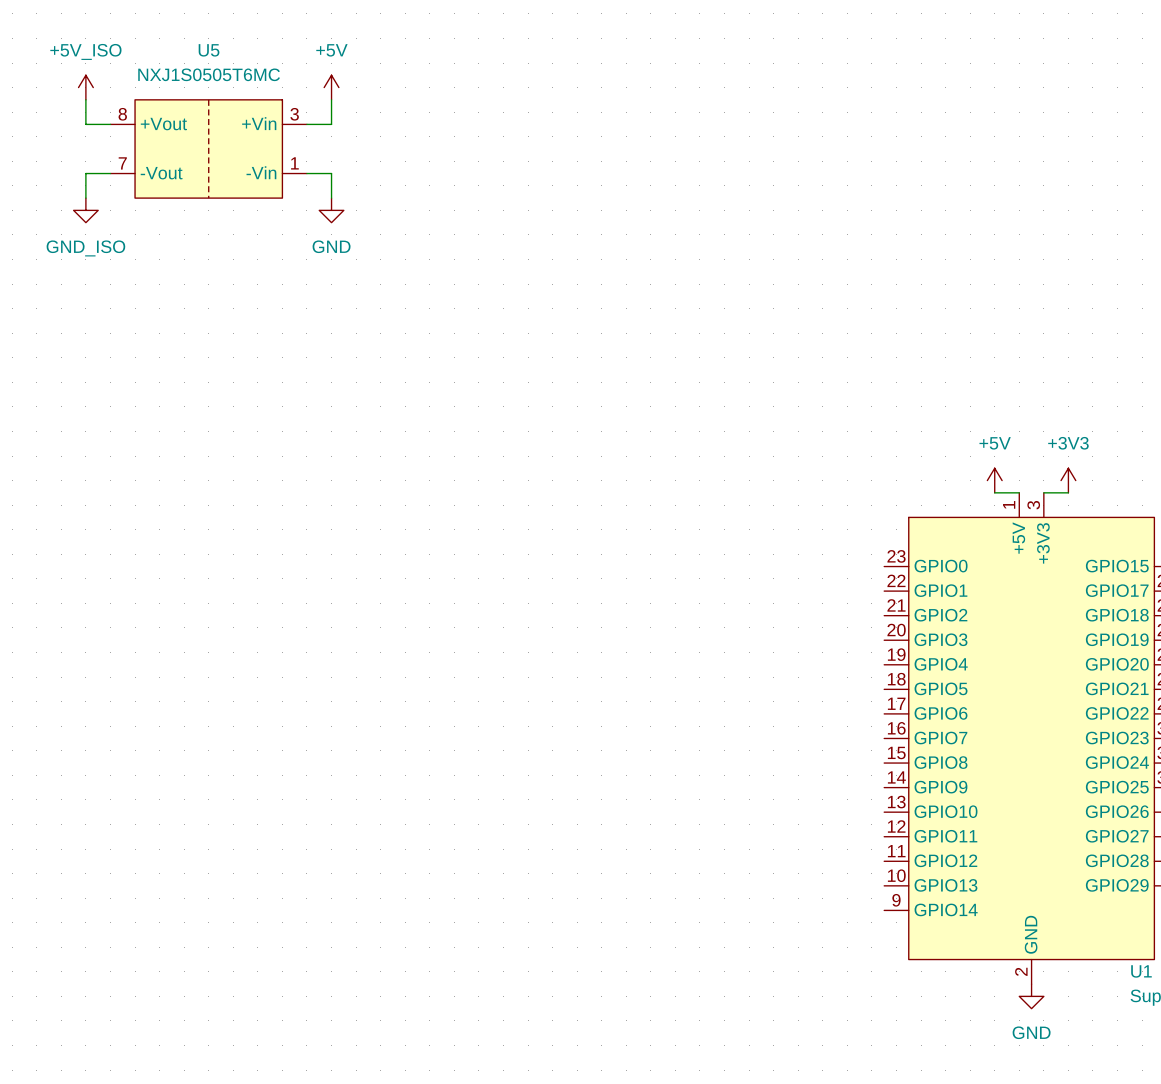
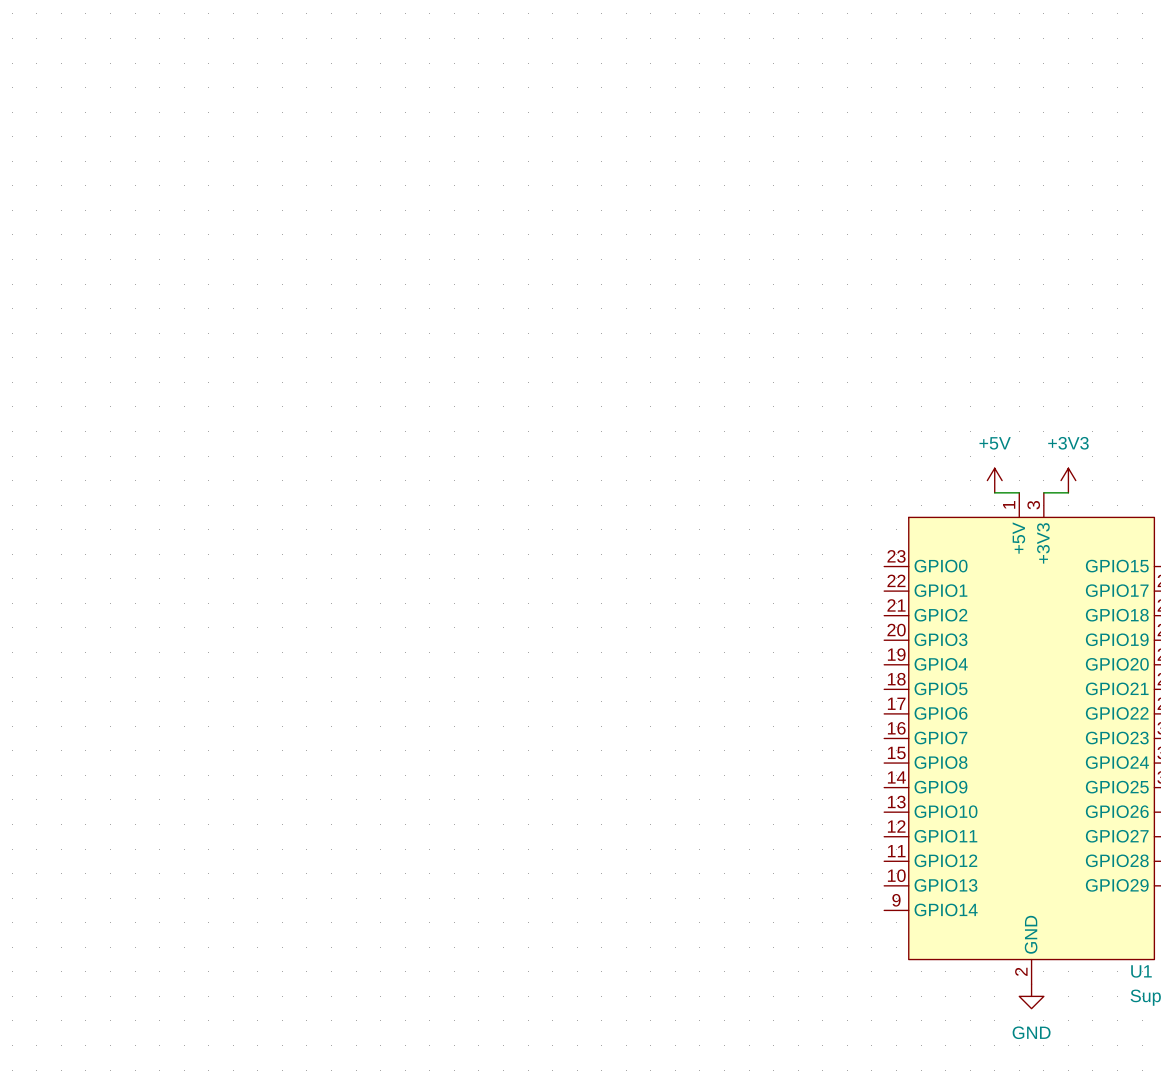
power symbol: +5V_ISO (85, 87) -> none
power symbol: +5V (331, 87) -> none
wire: (85, 99) (85, 124) (110, 124) -> none
wire: (331, 99) (331, 124) (306, 124) -> none
U5: NXJ1S0505T6MC (208, 148) -> none
wire: (110, 173) (85, 173) (85, 198) -> none
wire: (306, 173) (331, 173) (331, 198) -> none
power symbol: GND_ISO (85, 210) -> none
power symbol: GND (331, 210) -> none

